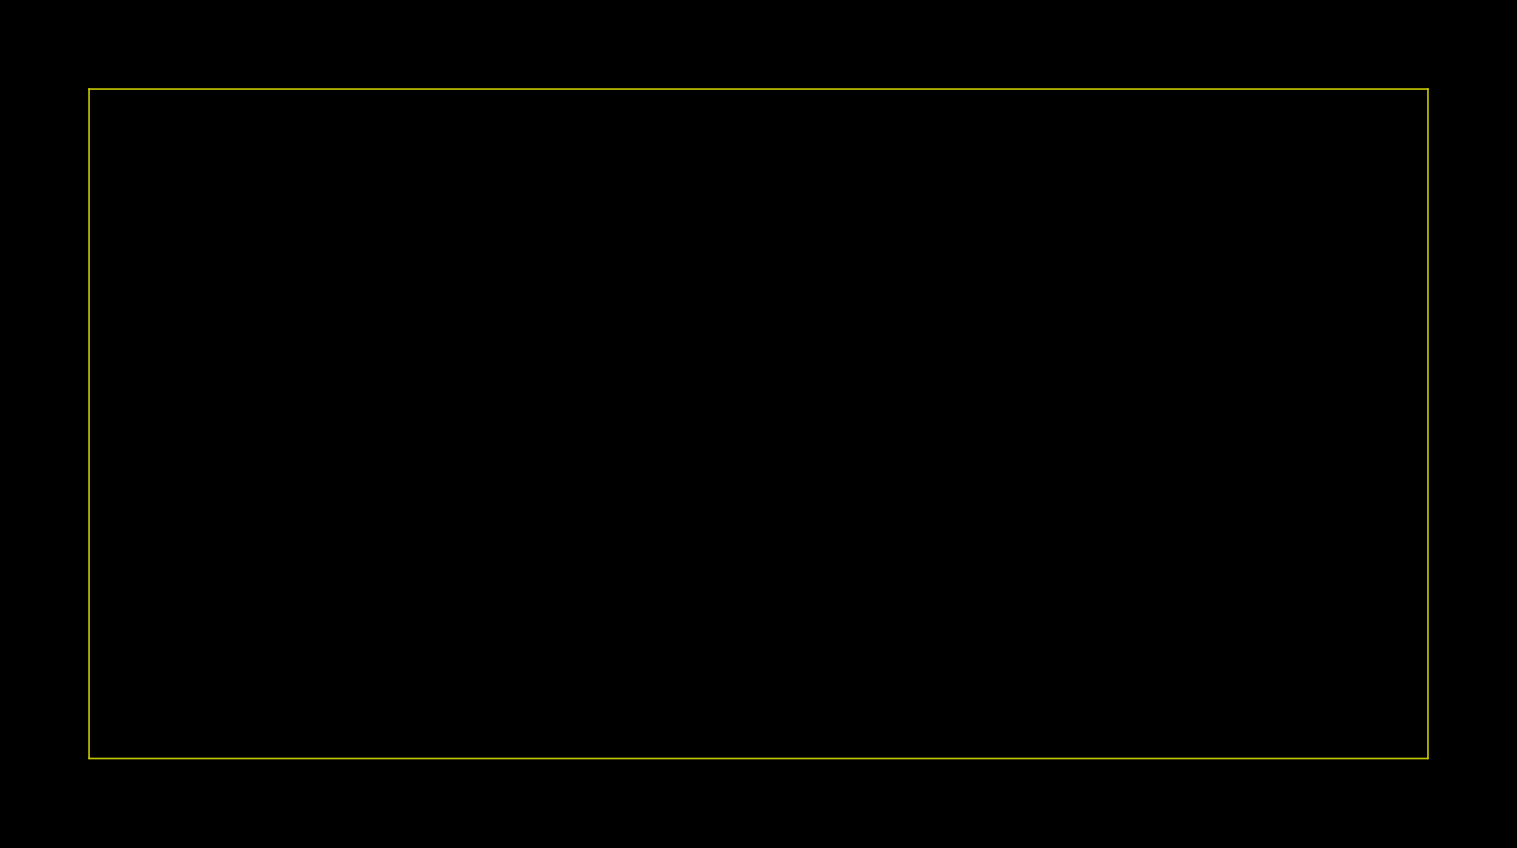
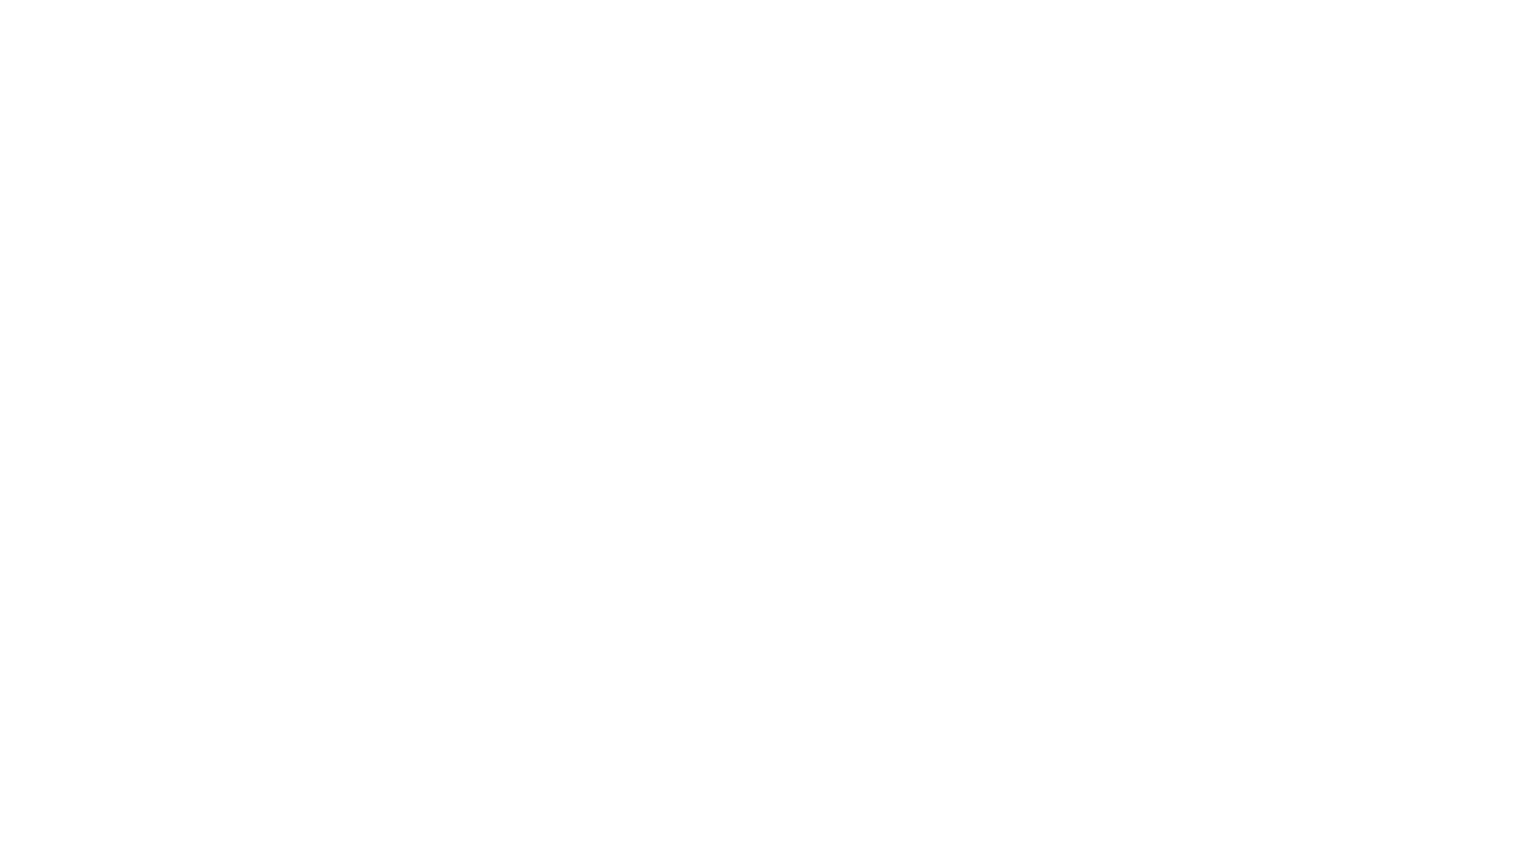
board edge: (89, 89) (1427, 89) (1427, 758) (89, 758) (89, 89) -> none

